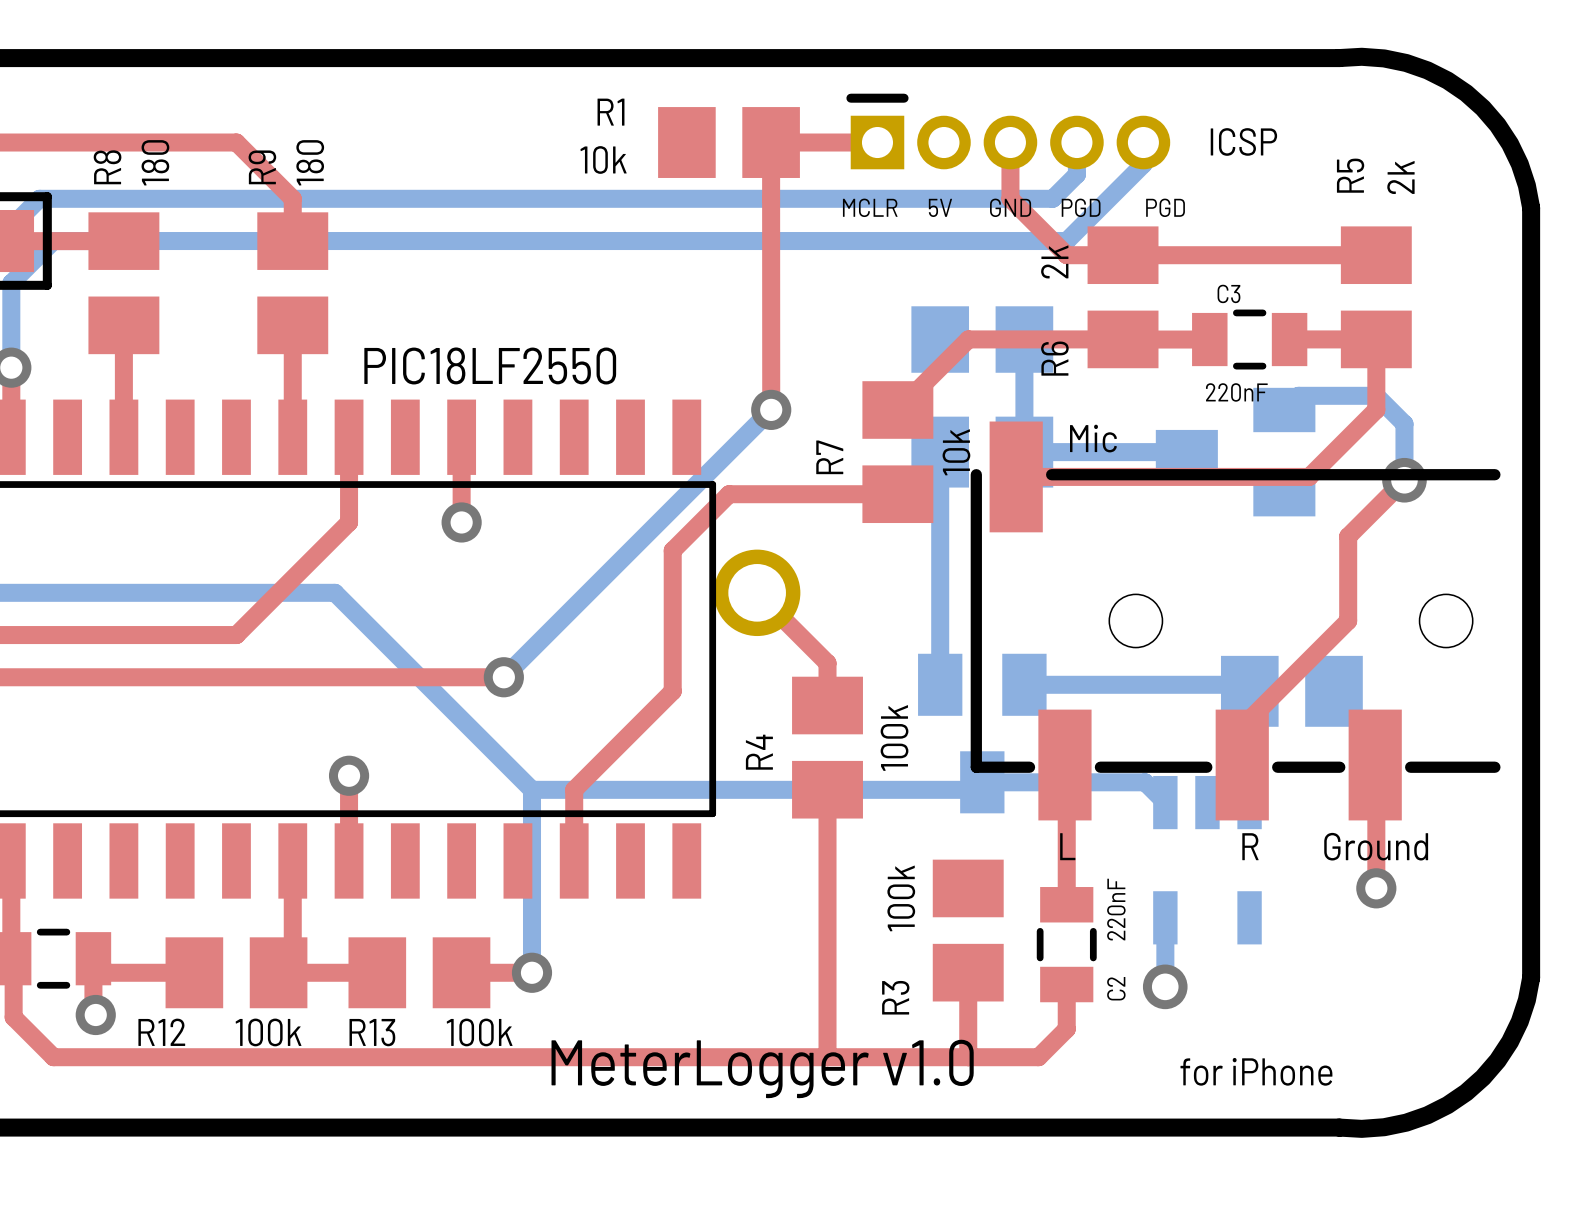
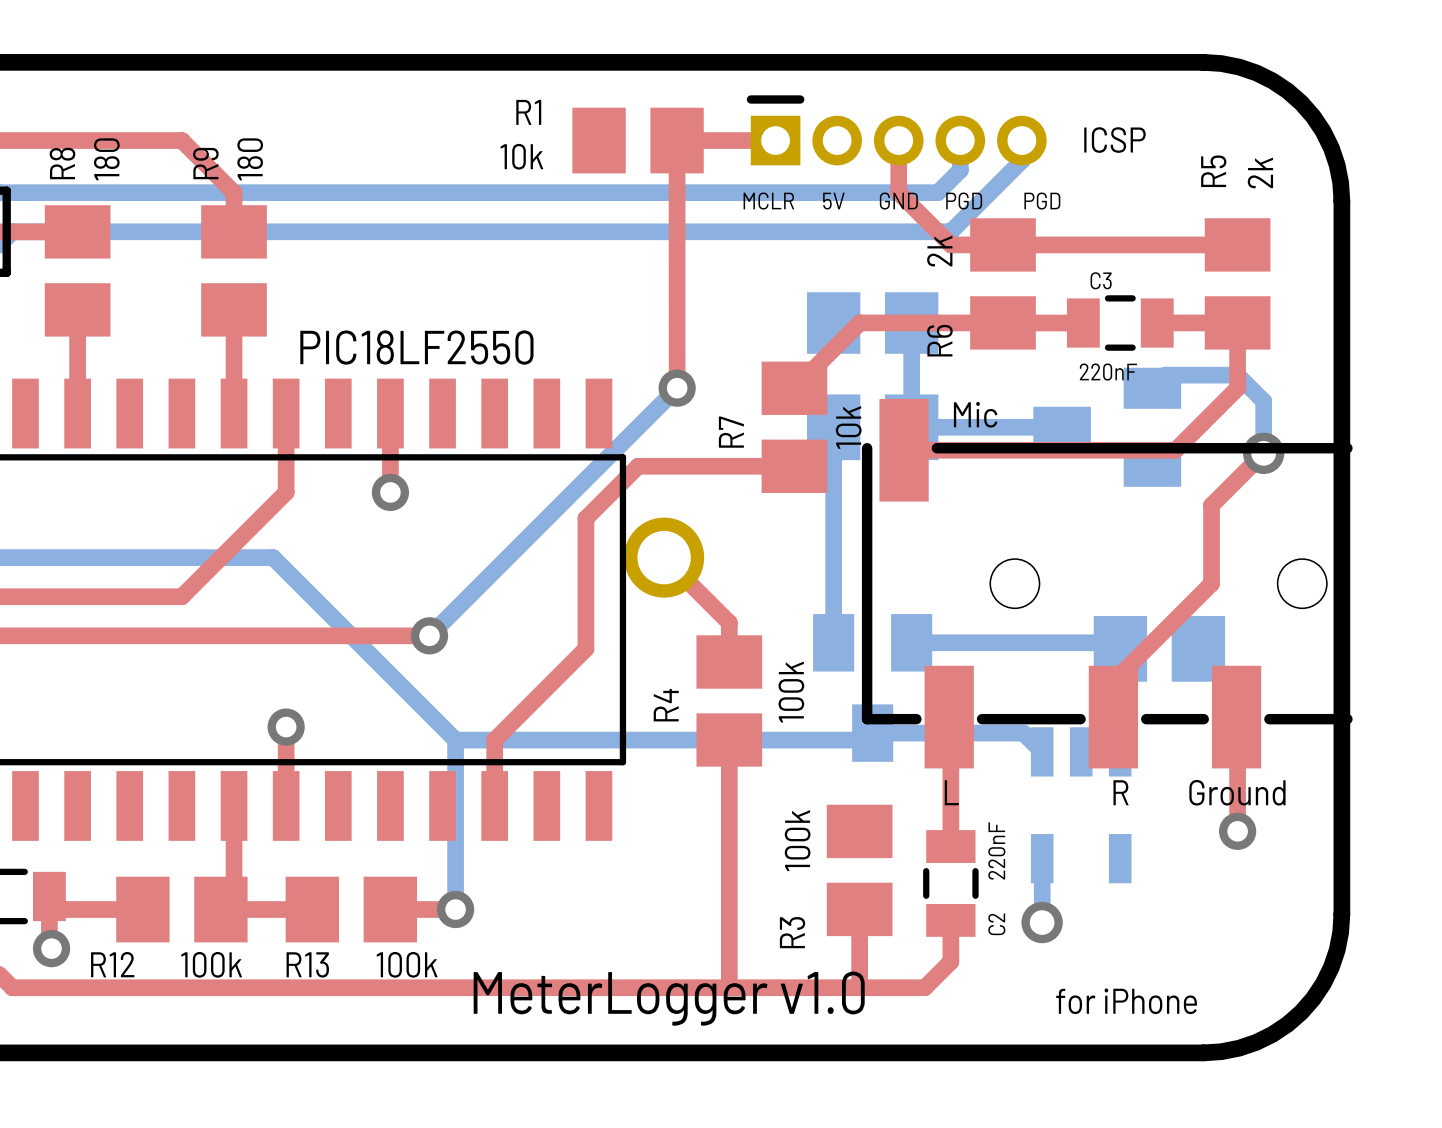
board edge: (1339, 58) (1361, 56) (1406, 62) (1447, 80) (1466, 93) (1483, 108) (1510, 143) (1526, 185) (1531, 207) (1531, 977) (1526, 1000) (1510, 1041) (1497, 1060) (1483, 1077) (1447, 1105) (1406, 1122) (1361, 1128) (1339, 1127) -> (1203, 62) (1239, 67) (1256, 72) (1287, 90) (1301, 102) (1313, 116) (1331, 147) (1337, 165) (1341, 200) (1340, 932) (1331, 967) (1313, 998) (1301, 1012) (1287, 1024) (1256, 1042) (1239, 1048) (1203, 1052)

